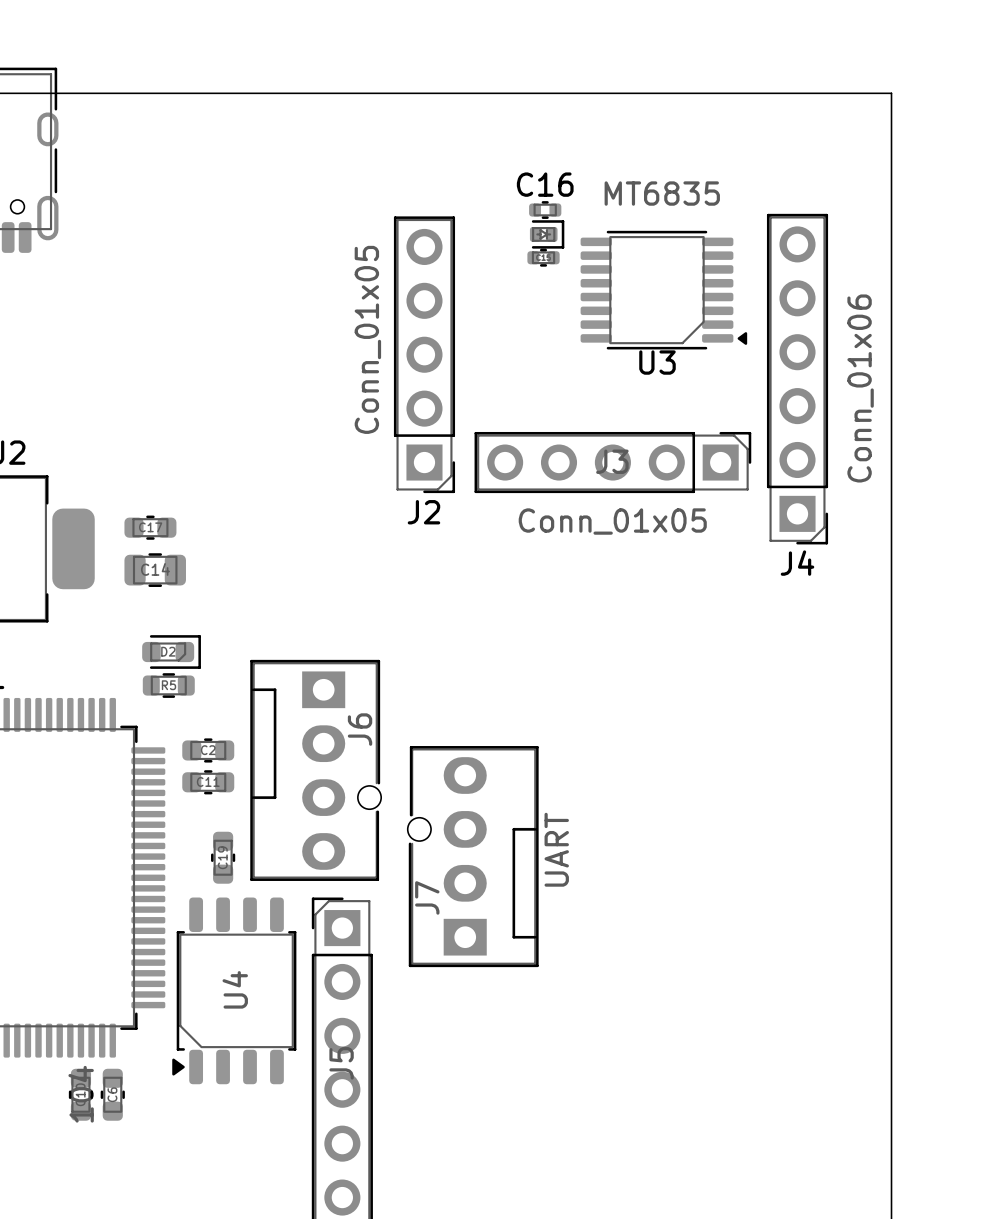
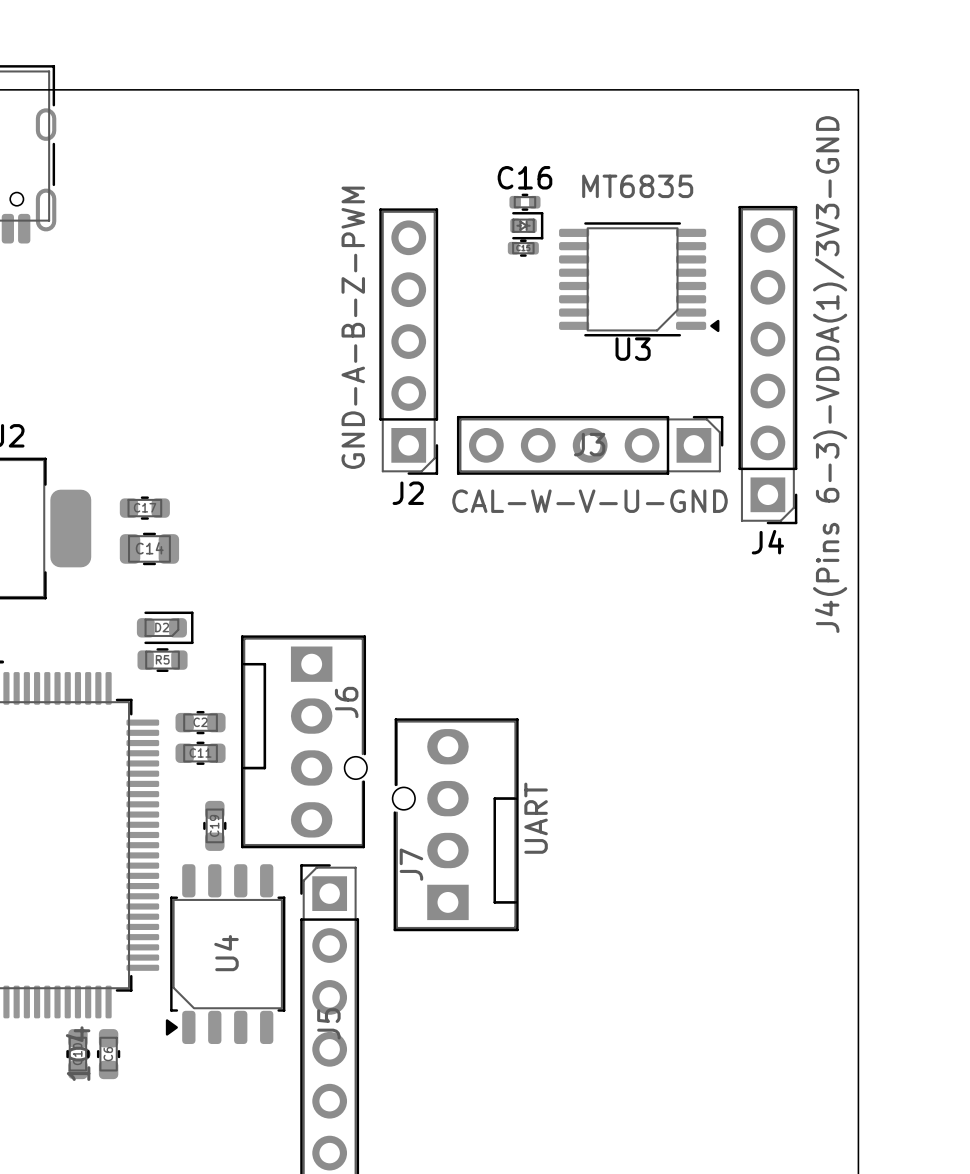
J2 value: Conn_01x05 (367, 339) -> GND-A-B-Z-PWM (353, 327)
J4 value: Conn_01x06 (860, 388) -> J4(Pins 6-3)-VDDA(1)/3V3-GND (830, 374)
part value: Conn_01x05 (612, 521) -> CAL-W-V-U-GND (590, 501)

